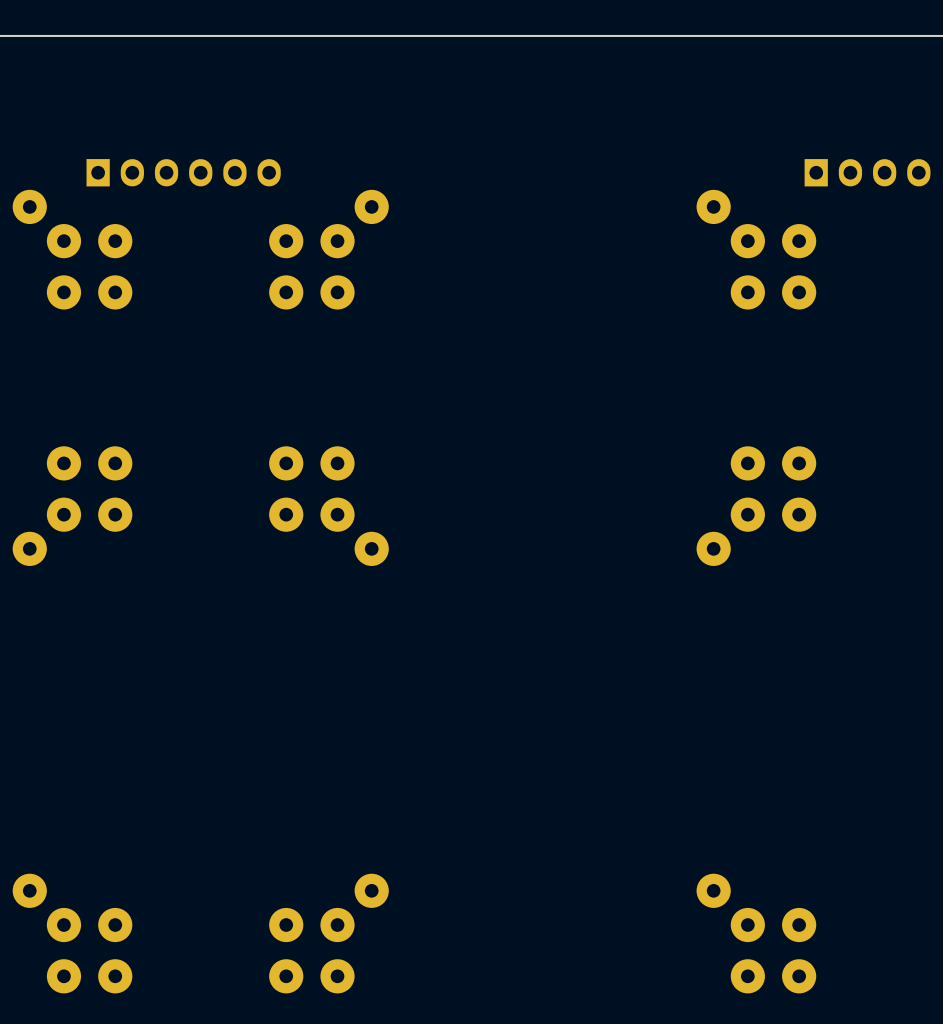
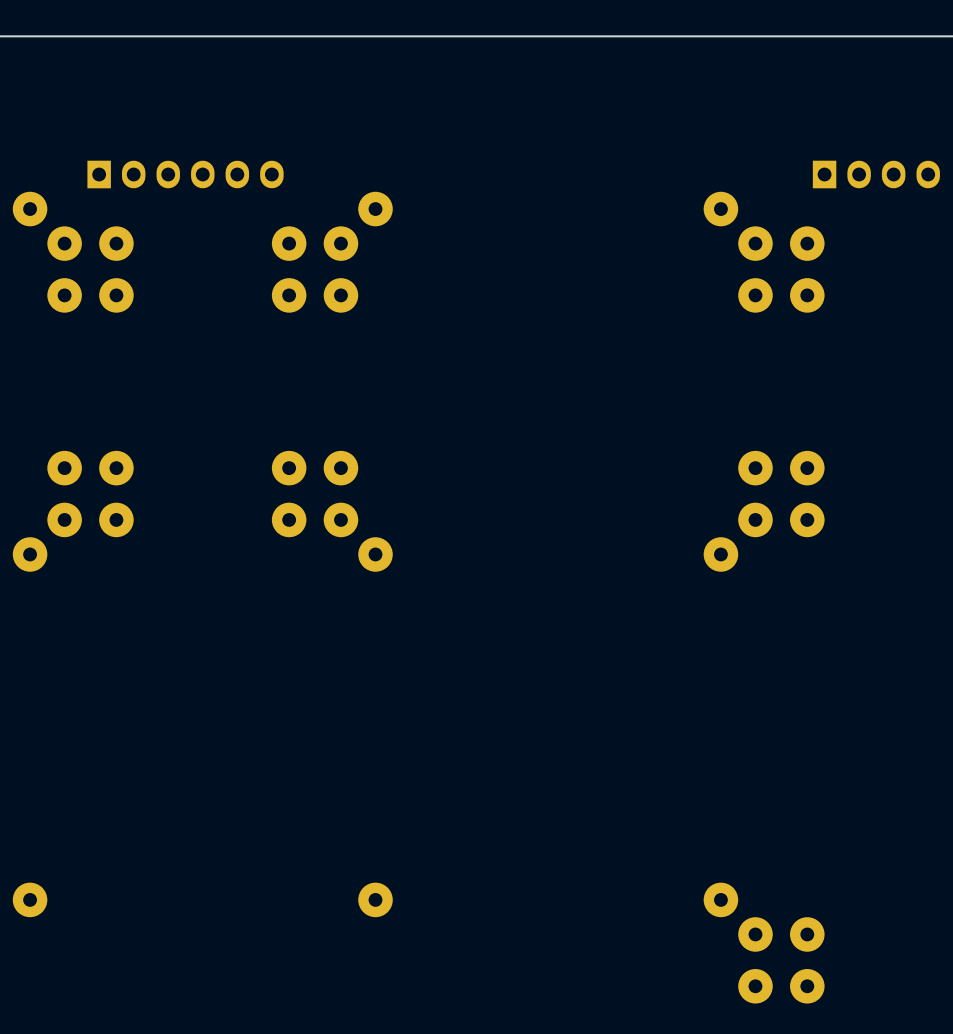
part: (63, 925) -> none
part: (115, 925) -> none
part: (286, 925) -> none
part: (337, 925) -> none
part: (63, 976) -> none
part: (115, 976) -> none
part: (286, 976) -> none
part: (337, 976) -> none

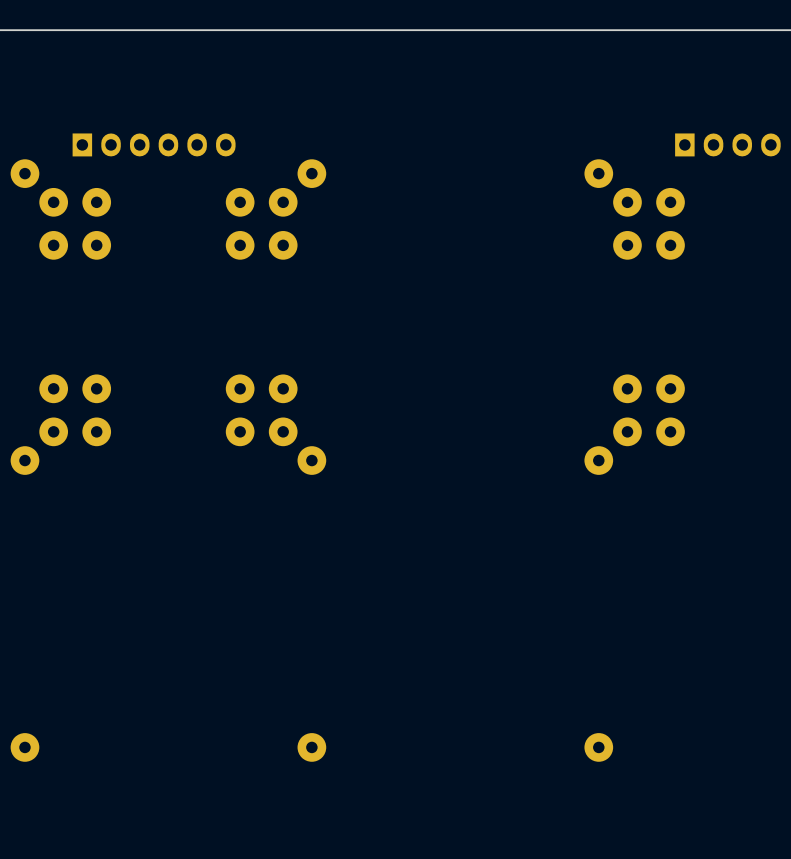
part: (755, 934) -> none
part: (807, 934) -> none
part: (755, 986) -> none
part: (807, 986) -> none

